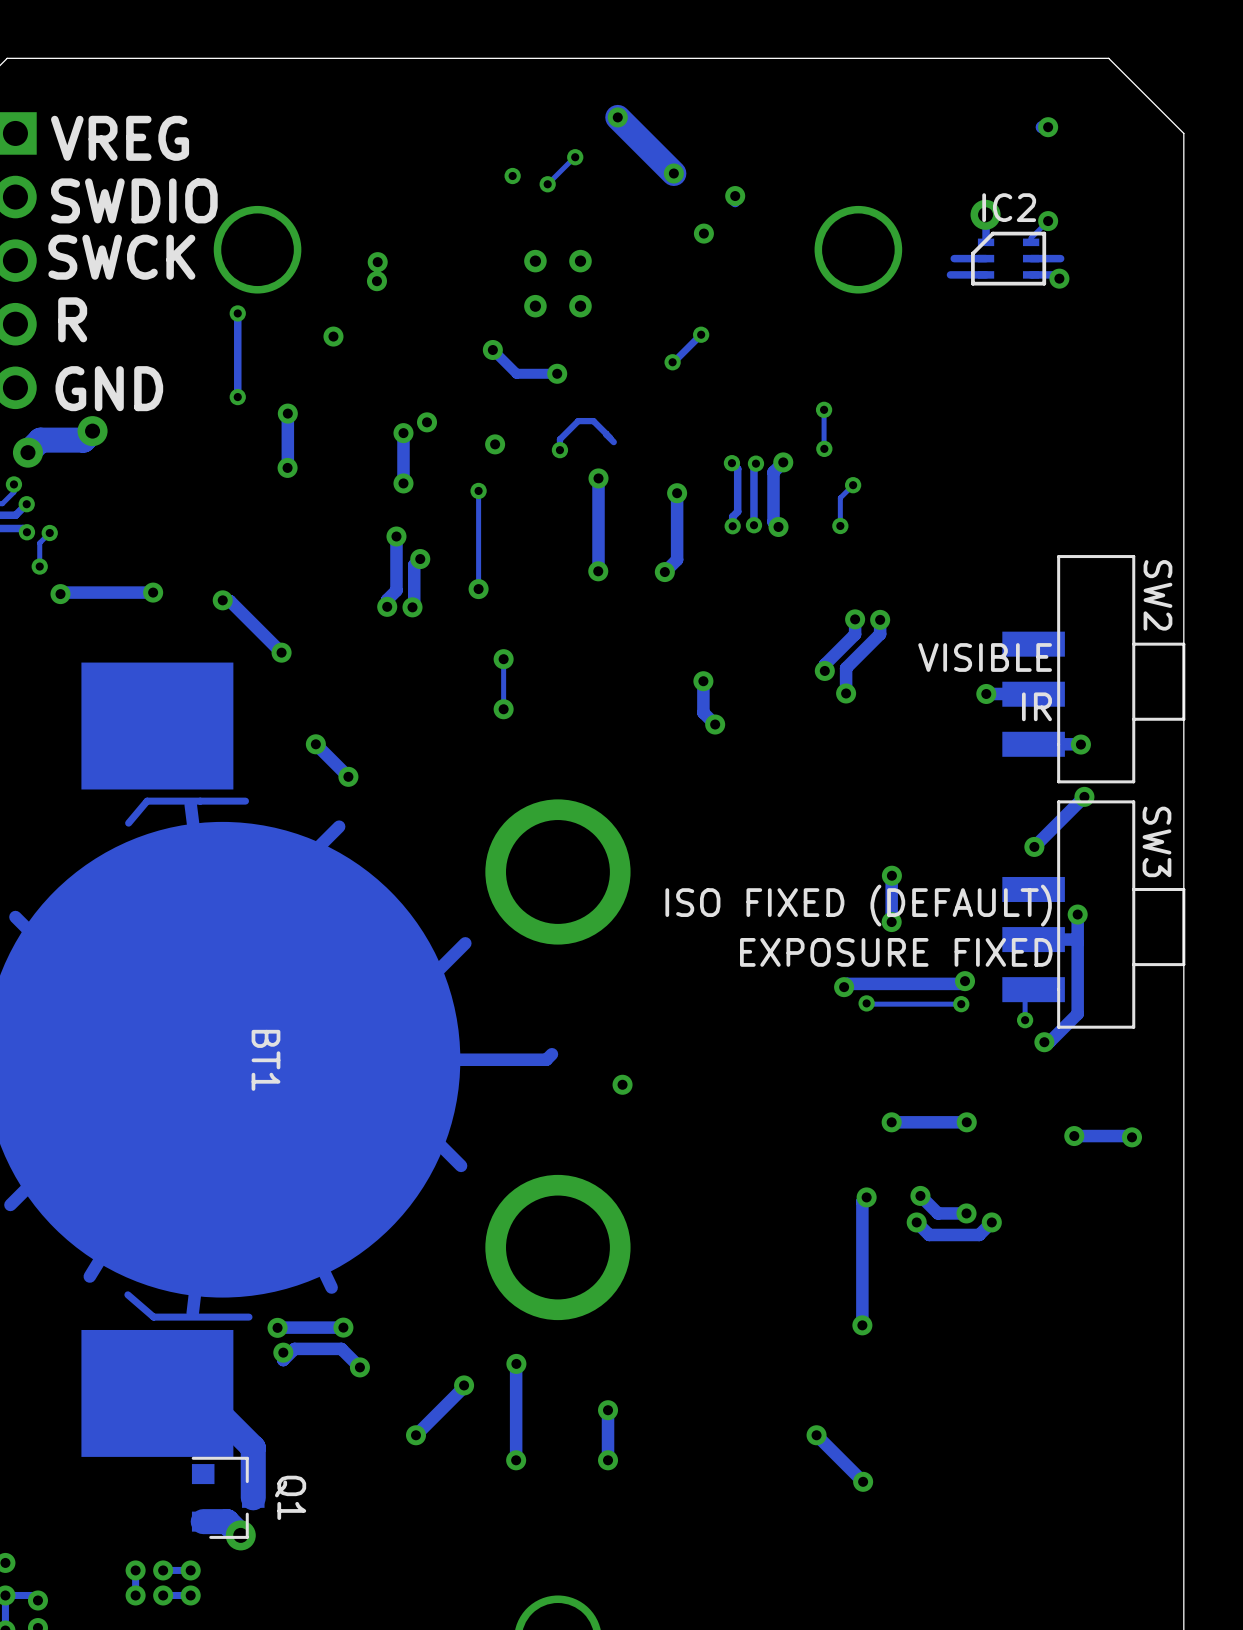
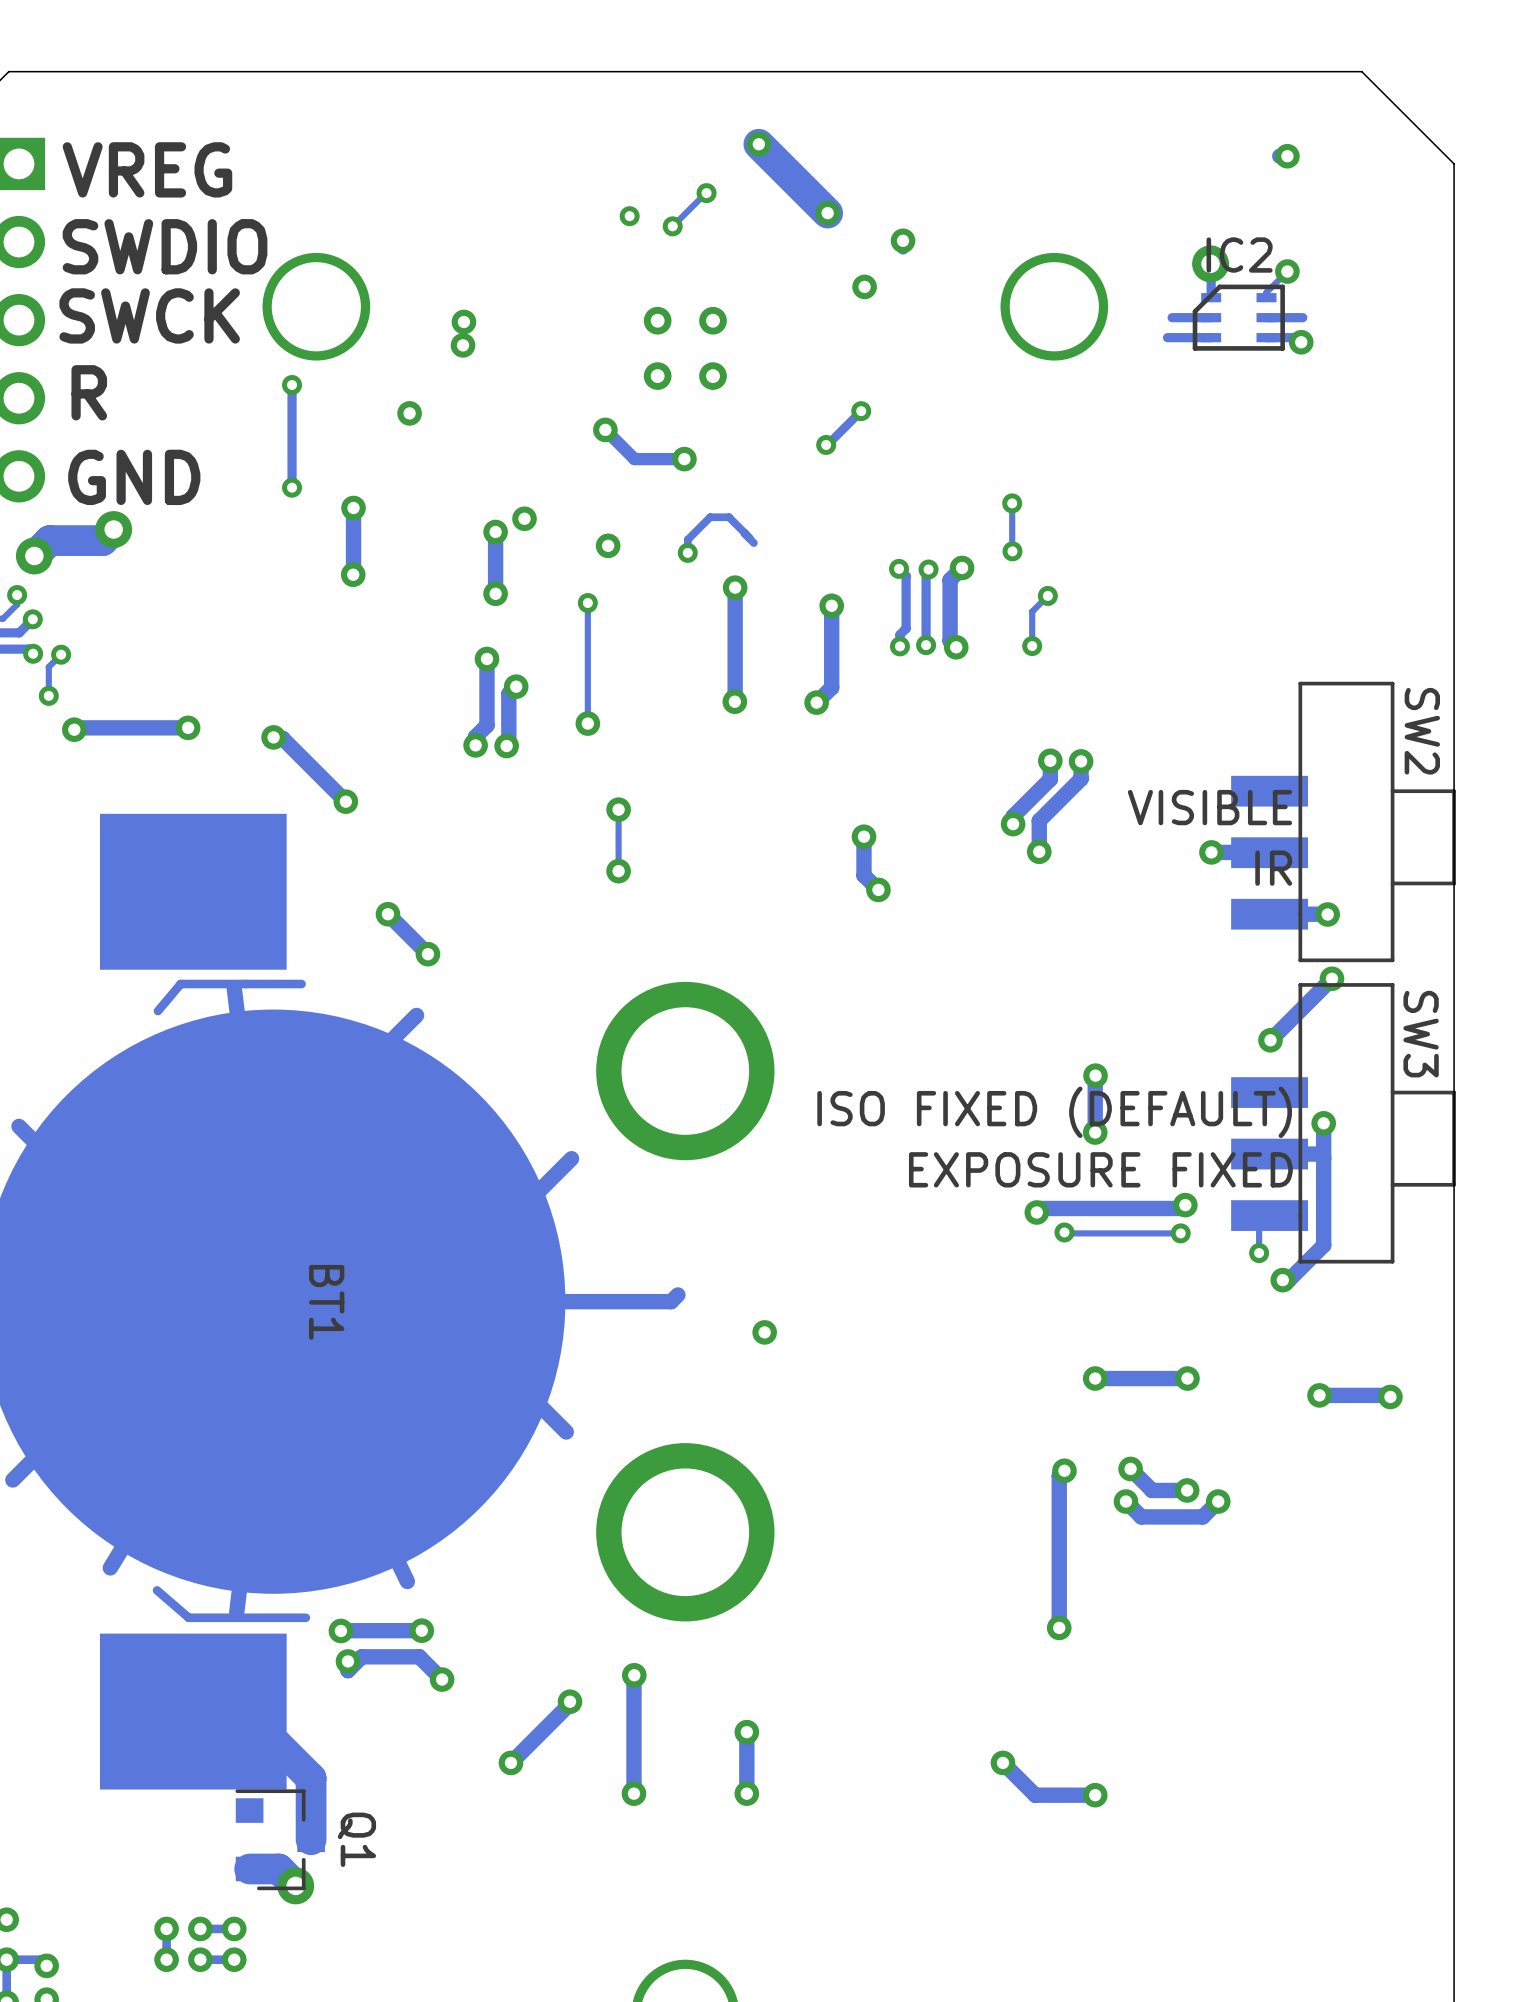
track: (842, 1461) (863, 1481) -> (1035, 1795) (1095, 1795)
via position: (863, 1481) -> (1095, 1795)

